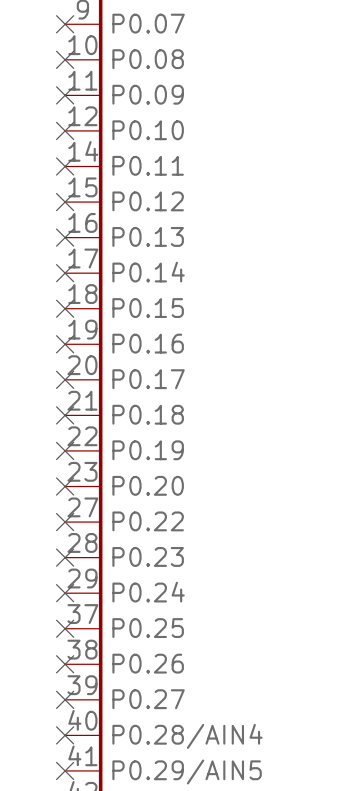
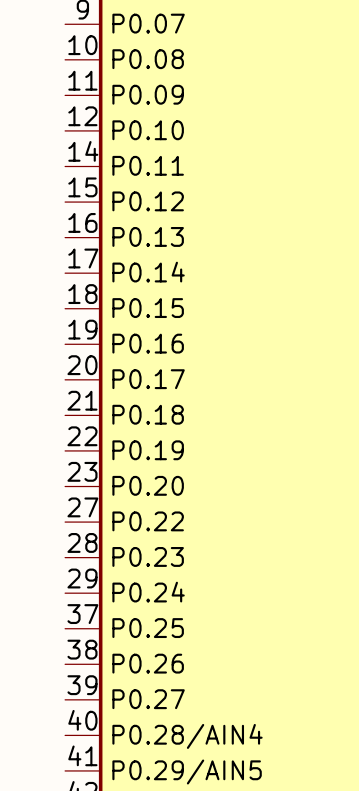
no-connect mark: (65, 24) -> none
no-connect mark: (65, 59) -> none
no-connect mark: (65, 95) -> none
no-connect mark: (65, 130) -> none
no-connect mark: (65, 166) -> none
no-connect mark: (65, 202) -> none
no-connect mark: (65, 237) -> none
no-connect mark: (65, 273) -> none
no-connect mark: (65, 308) -> none
no-connect mark: (65, 344) -> none
no-connect mark: (65, 379) -> none
no-connect mark: (65, 415) -> none
no-connect mark: (65, 450) -> none
no-connect mark: (65, 486) -> none
no-connect mark: (65, 522) -> none
no-connect mark: (65, 557) -> none
no-connect mark: (65, 593) -> none
no-connect mark: (65, 628) -> none
no-connect mark: (65, 664) -> none
no-connect mark: (65, 699) -> none
no-connect mark: (65, 735) -> none
no-connect mark: (65, 770) -> none

